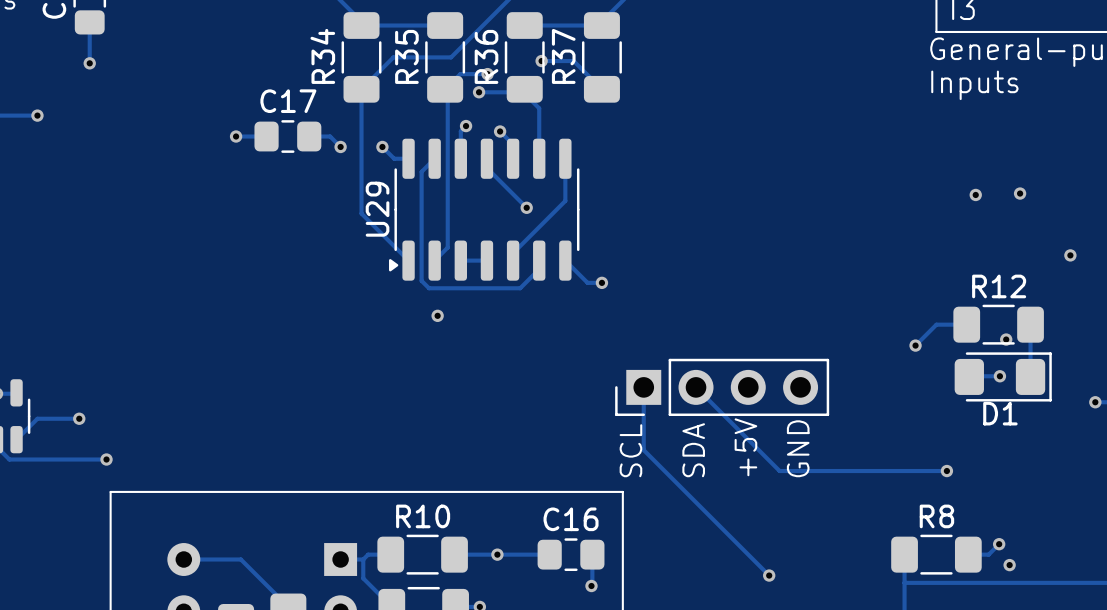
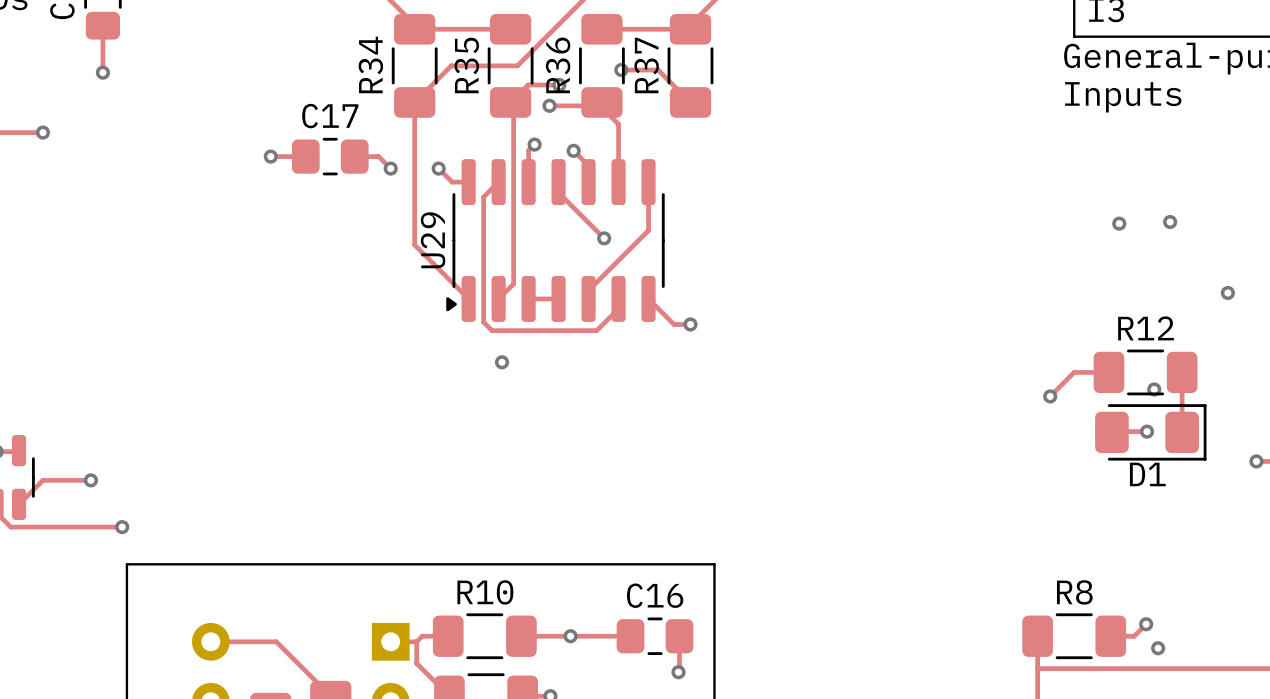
track: (643, 387) (643, 450) (769, 575) -> none
track: (696, 387) (779, 471) (946, 471) -> none
part: (722, 387) -> none
text: +5V (745, 447) -> none
text: GND (798, 448) -> none
text: SCL (630, 450) -> none
text: SDA (693, 450) -> none
via: (946, 471) -> none
via: (769, 575) -> none

